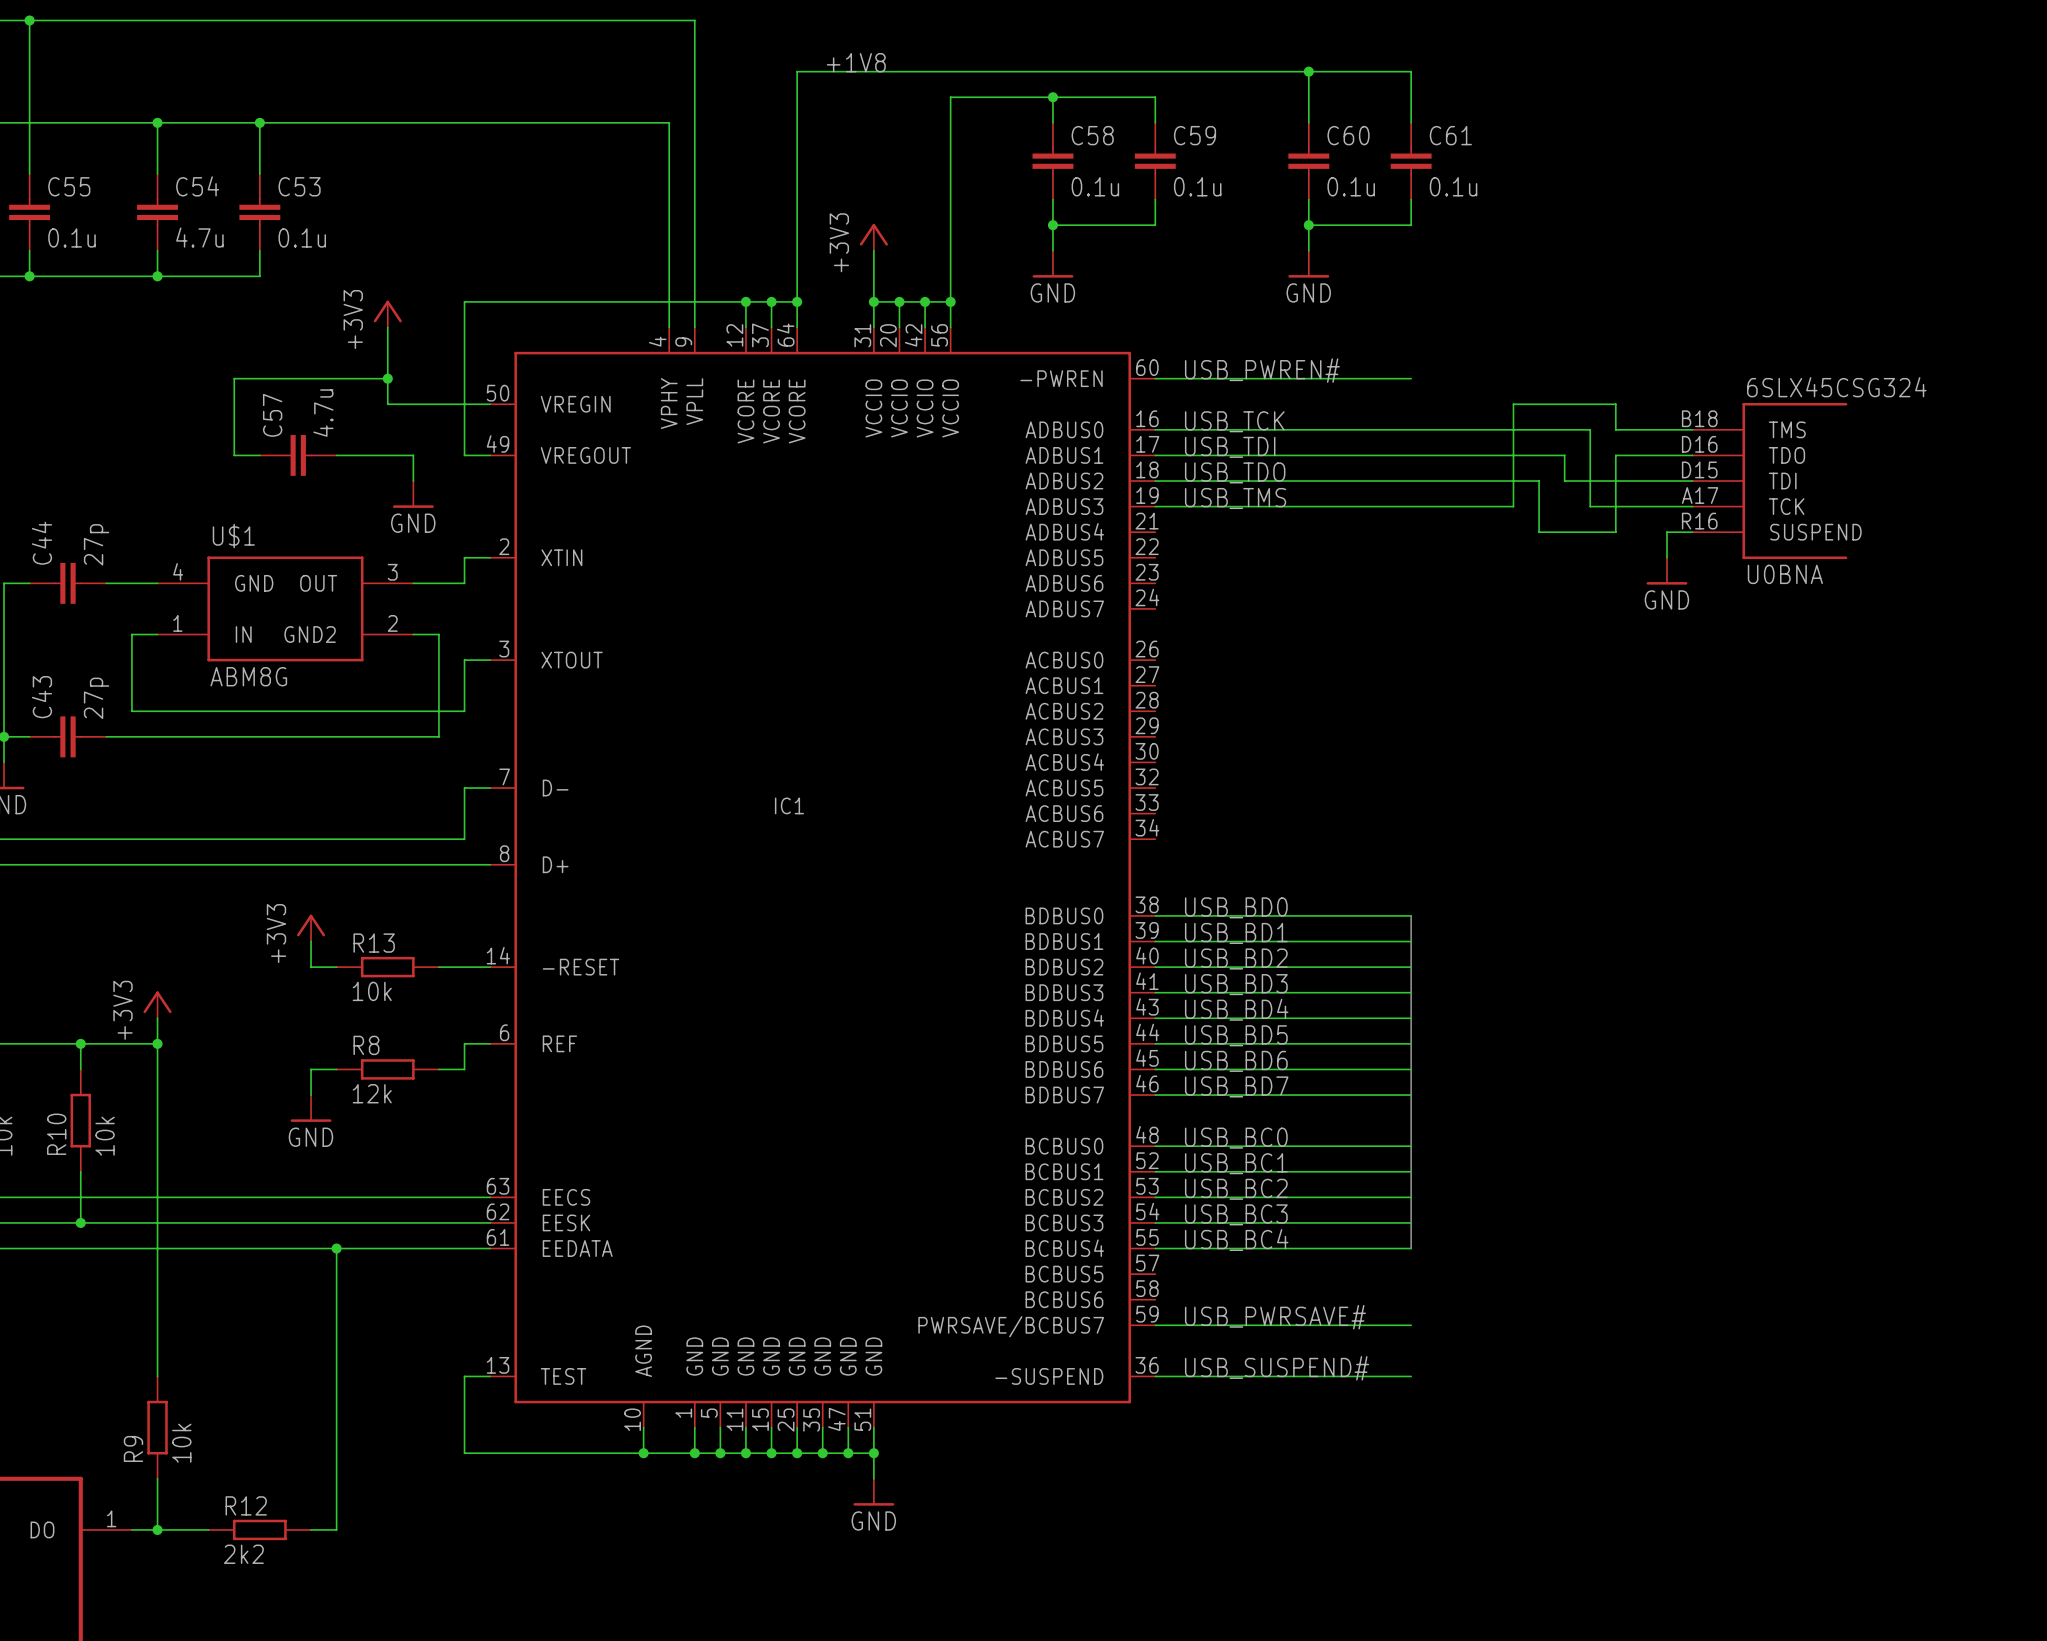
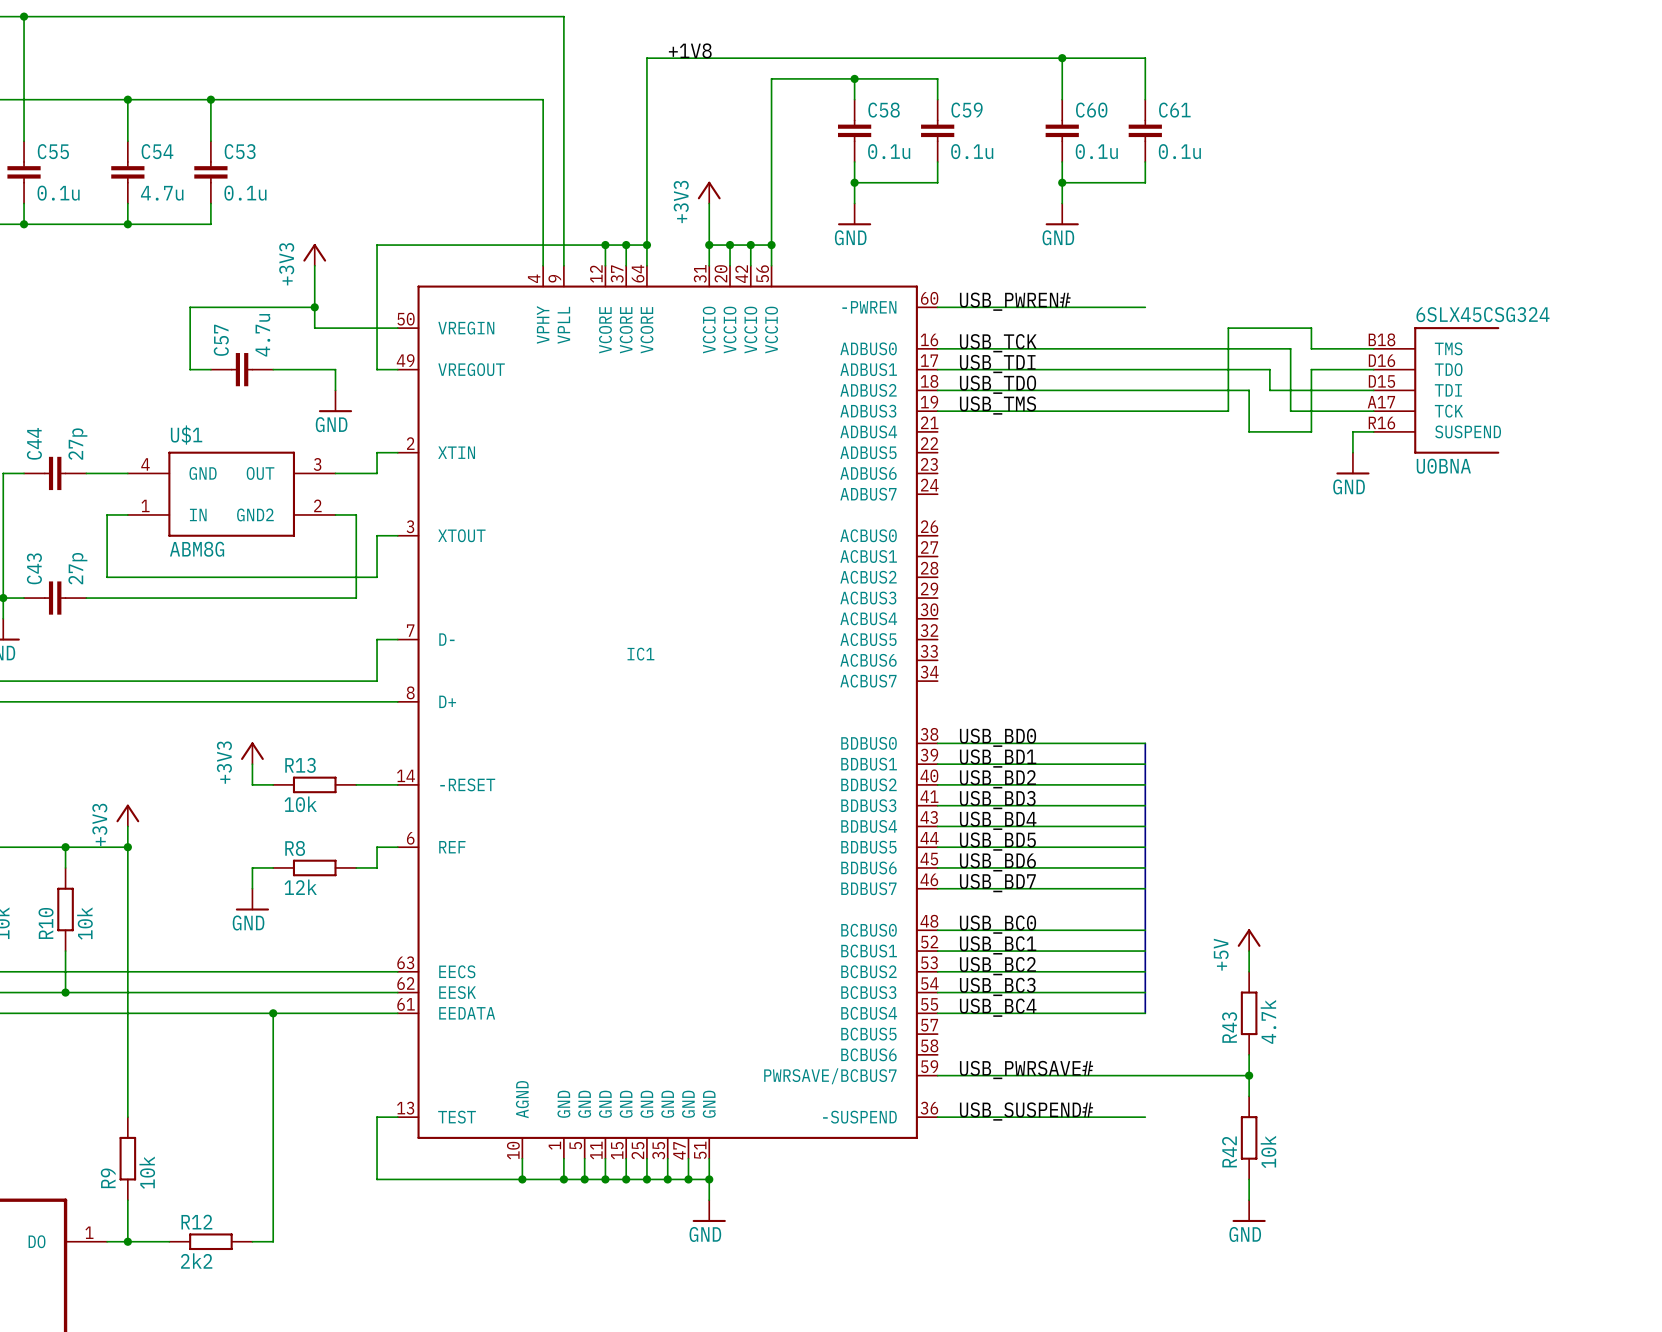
power symbol: none -> +5V (1249, 940)
wire: none -> (1249, 951) (1249, 971)
R43: none -> 4.7k (1249, 1013)
wire: none -> (1249, 1054) (1249, 1096)
wire: none -> (1145, 1075) (1249, 1075)
junction: none -> (1249, 1075)
R42: none -> 10k (1249, 1137)
wire: none -> (1249, 1179) (1249, 1200)
power symbol: none -> GND (1249, 1211)

